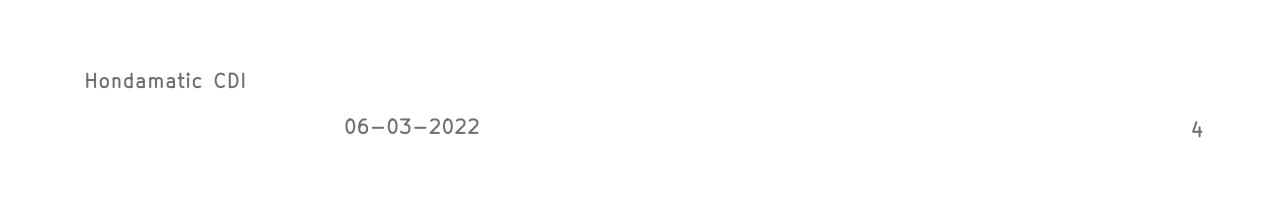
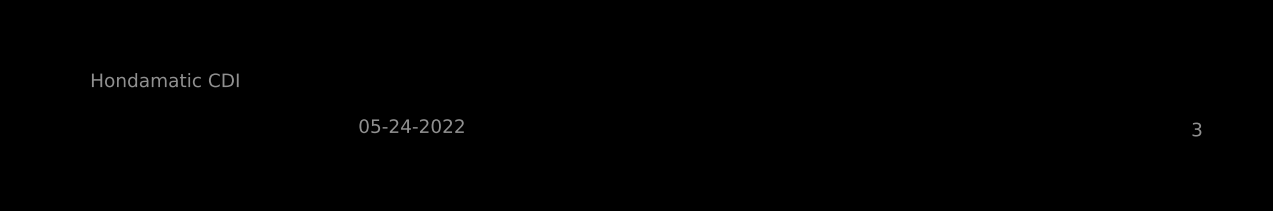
text: 06-03-2022 (411, 126) -> 05-24-2022 (411, 126)
text: 4 (1197, 129) -> 3 (1196, 129)

